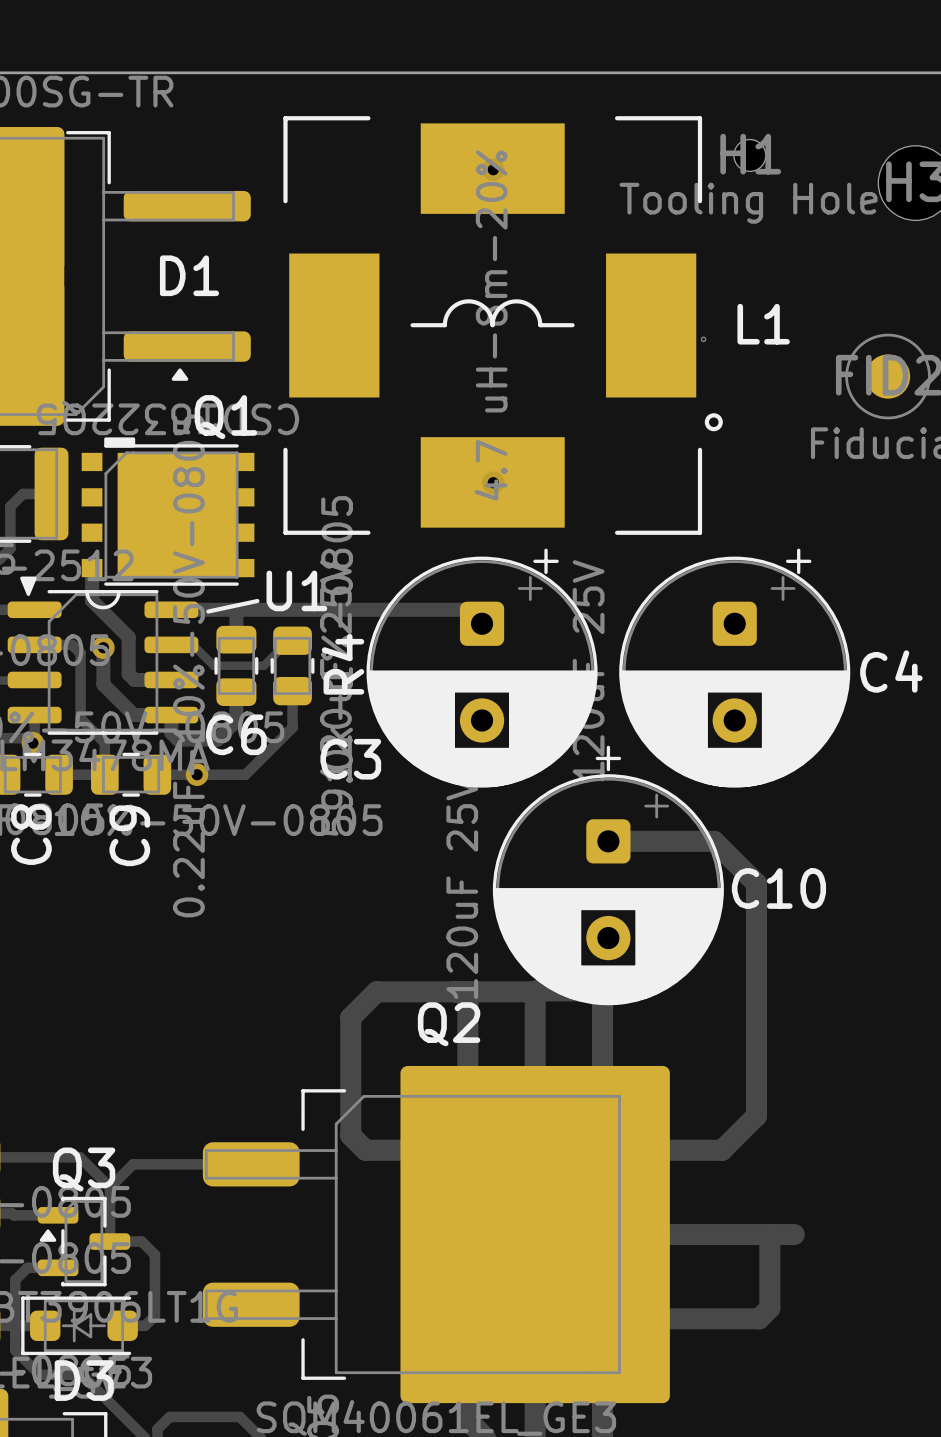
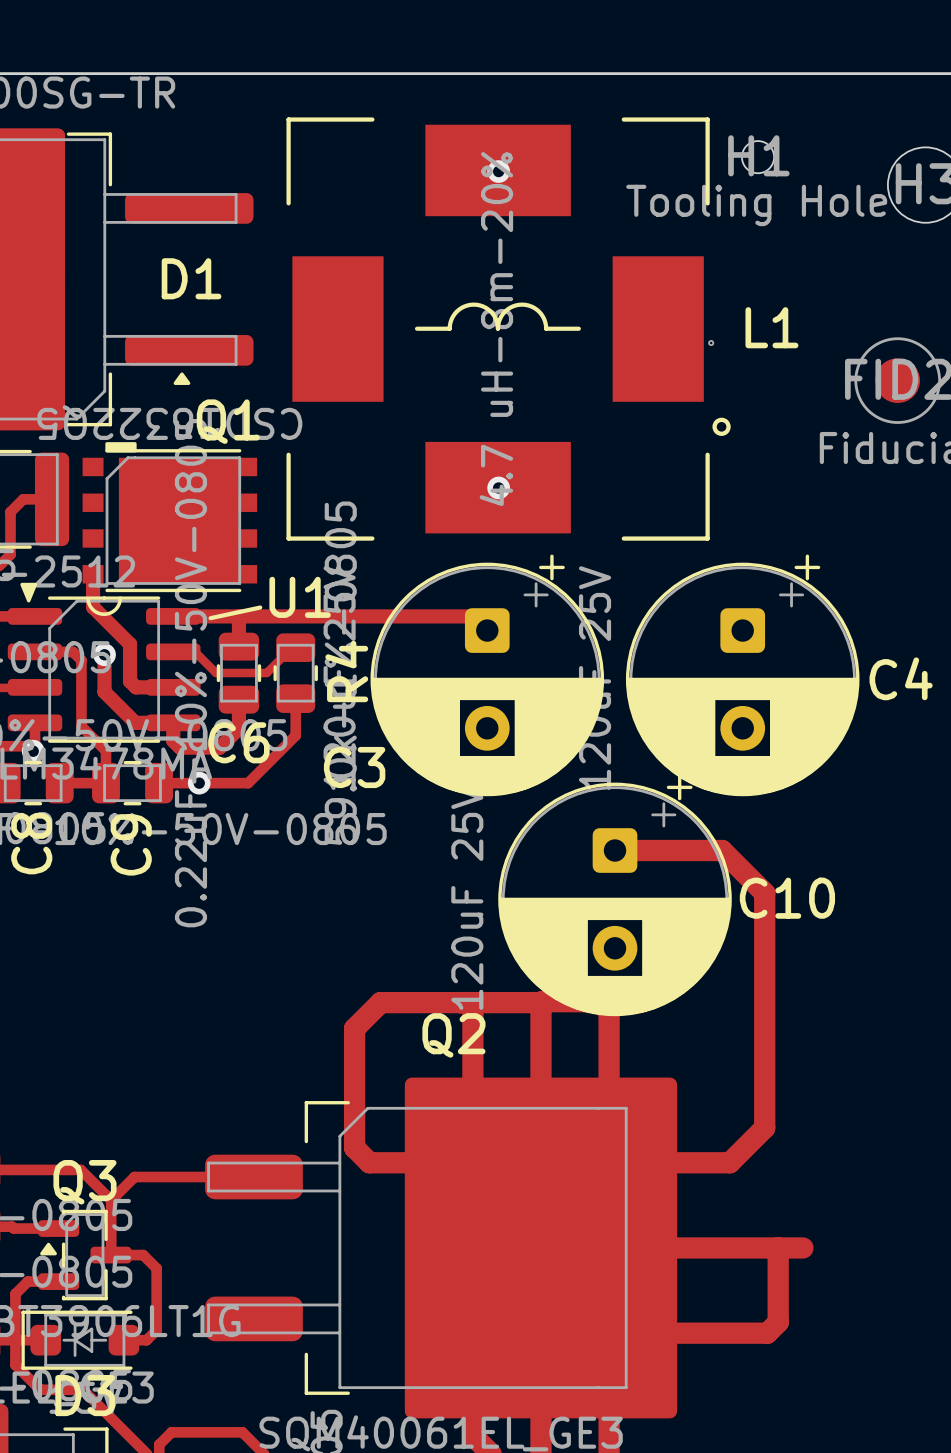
C10 footprint: [492, 745, 724, 1006] -> [498, 774, 732, 1017]

